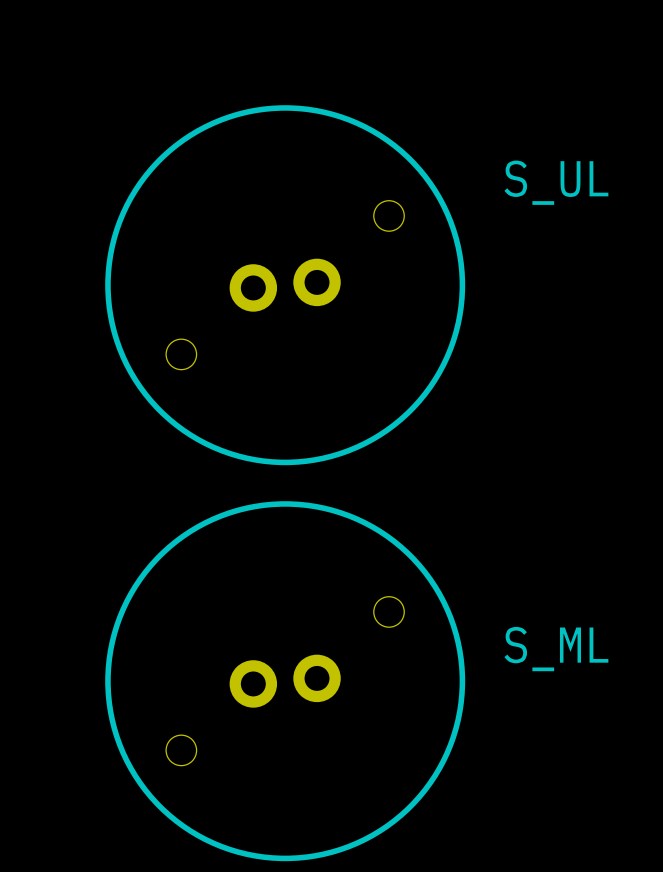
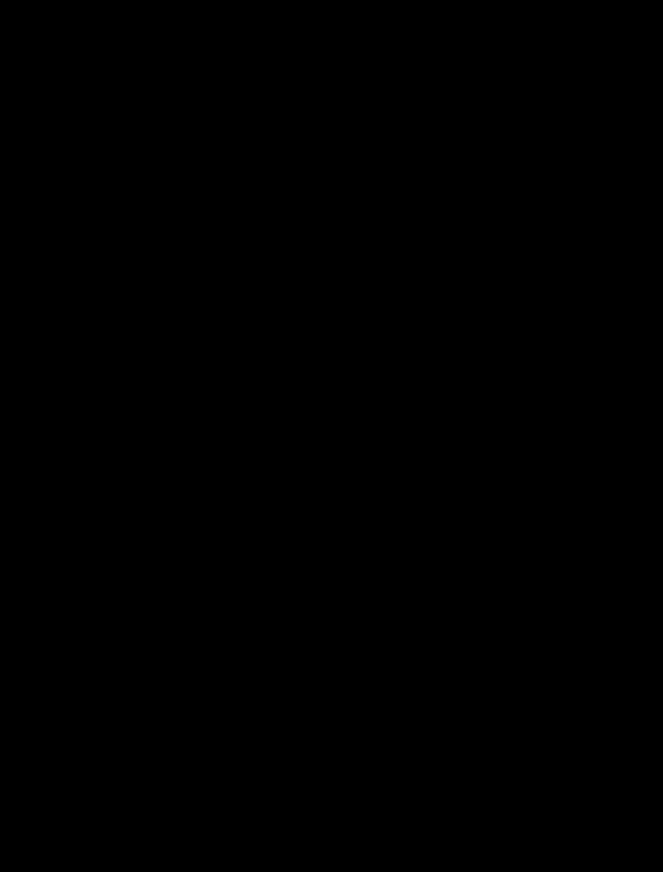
S_UL: (285, 285) -> none
S_ML: (285, 681) -> none

